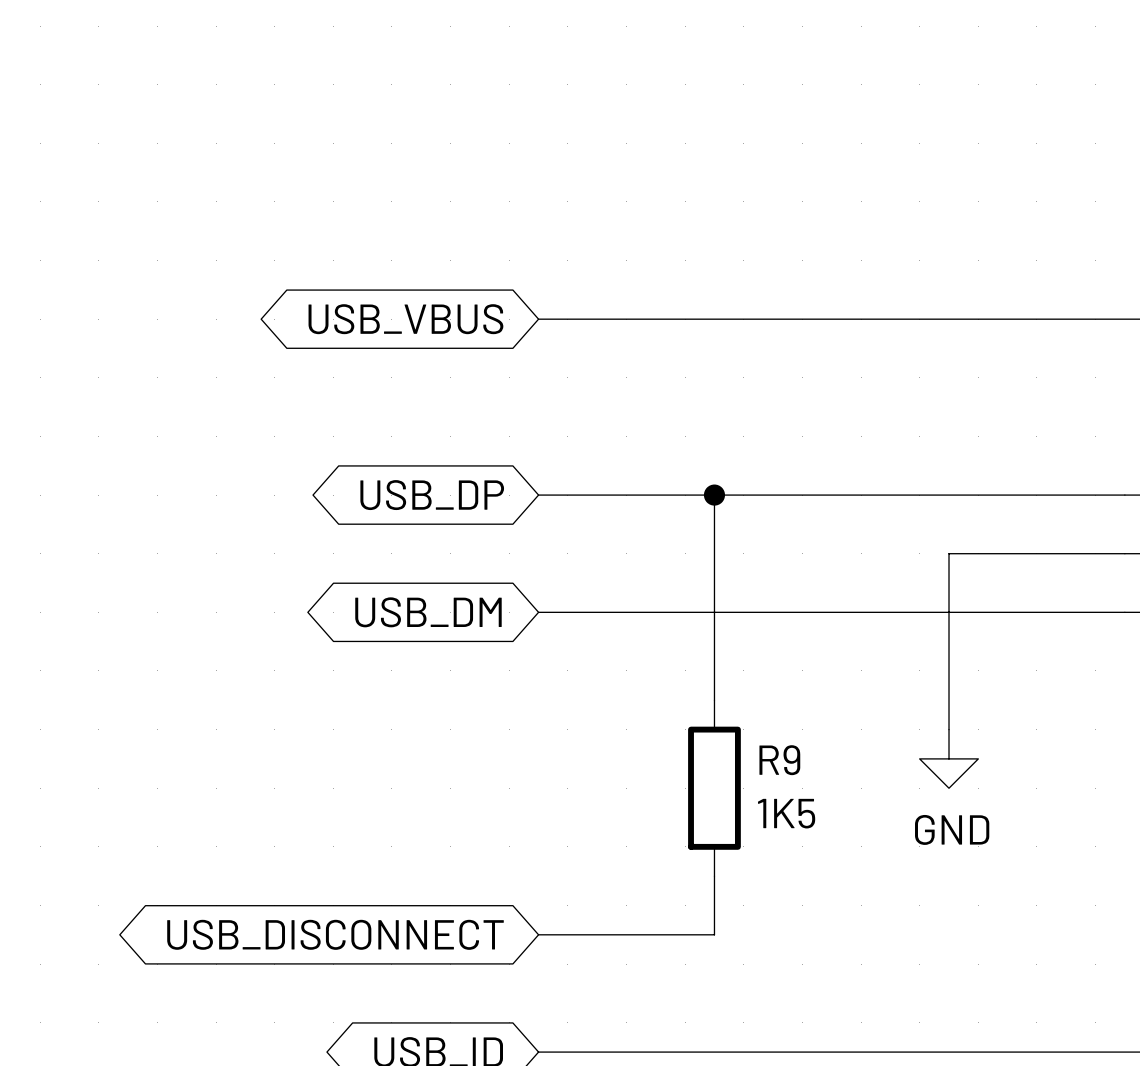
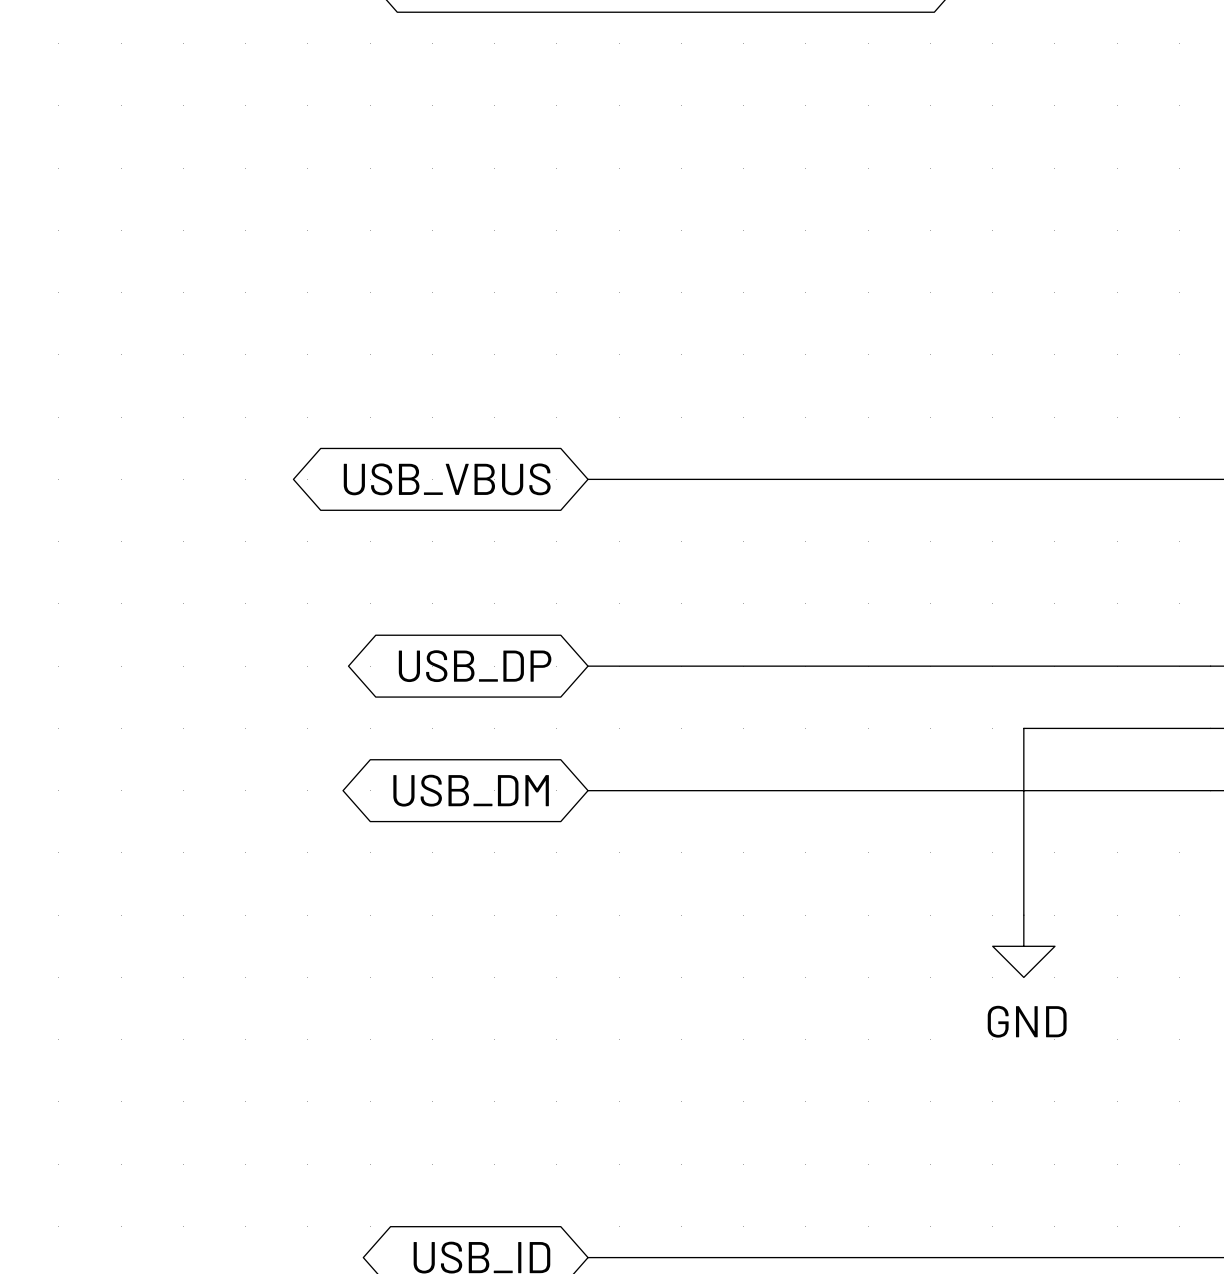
wire: (714, 495) (714, 700) -> none
junction: (714, 495) -> none
R9: 1K5 (714, 788) -> none
wire: (714, 876) (714, 934) (538, 934) -> none
global label: USB_DISCONNECT (335, 934) -> none

